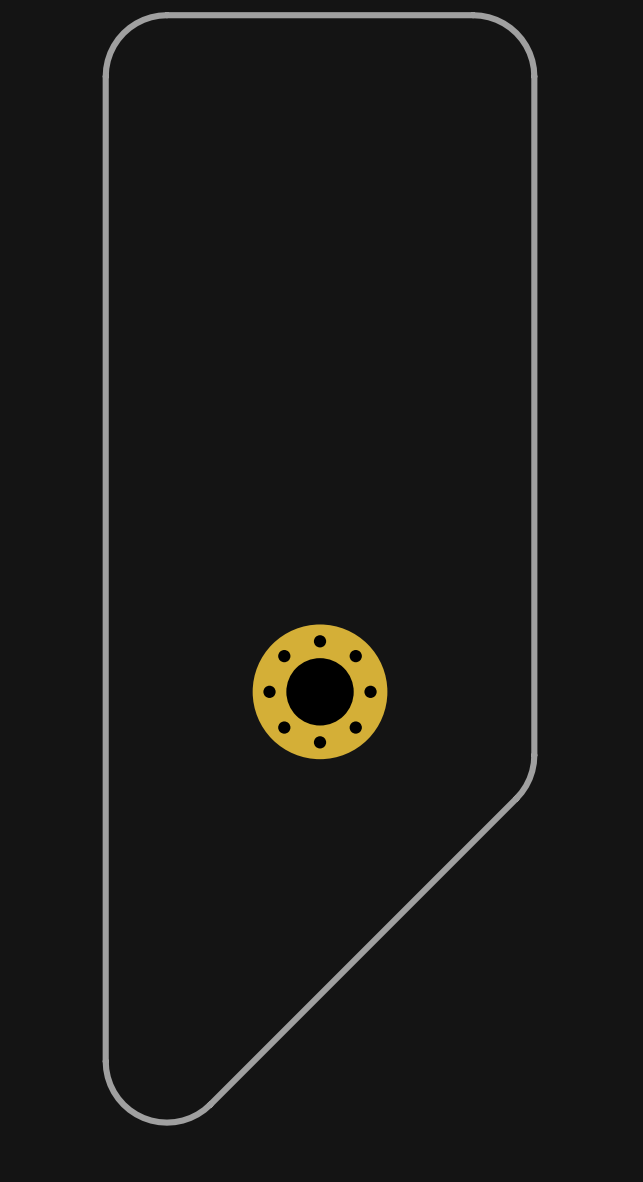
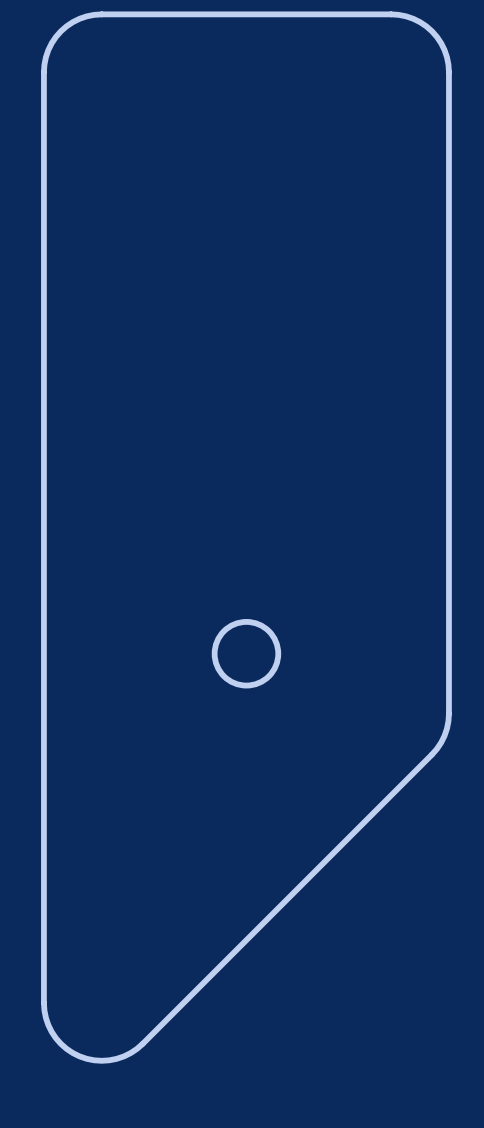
round board edge: none -> [211, 619, 282, 689]
part: (320, 691) -> none

